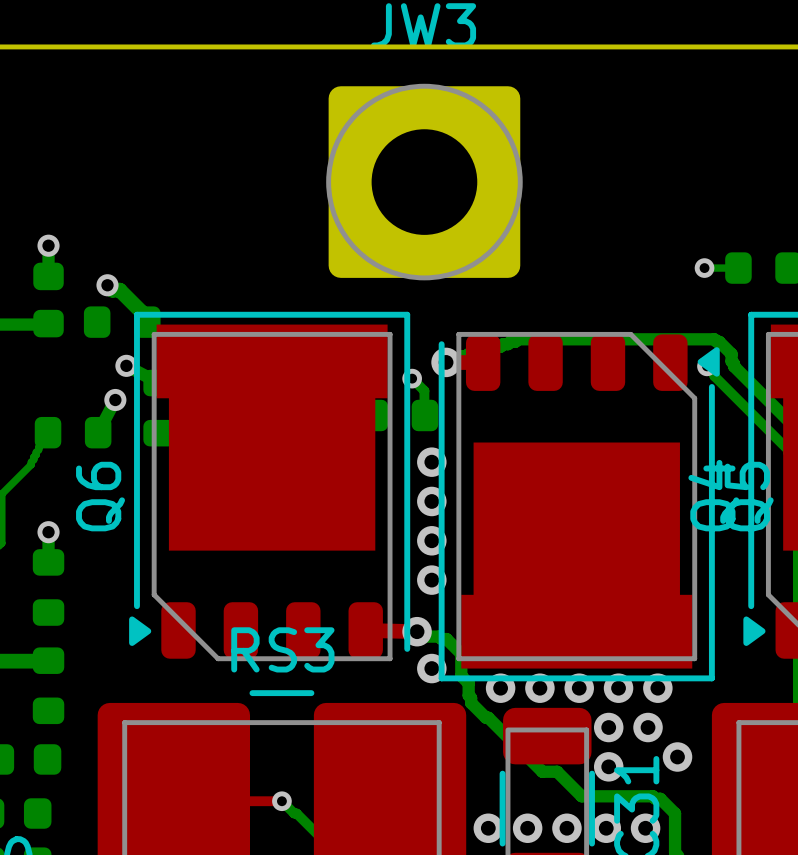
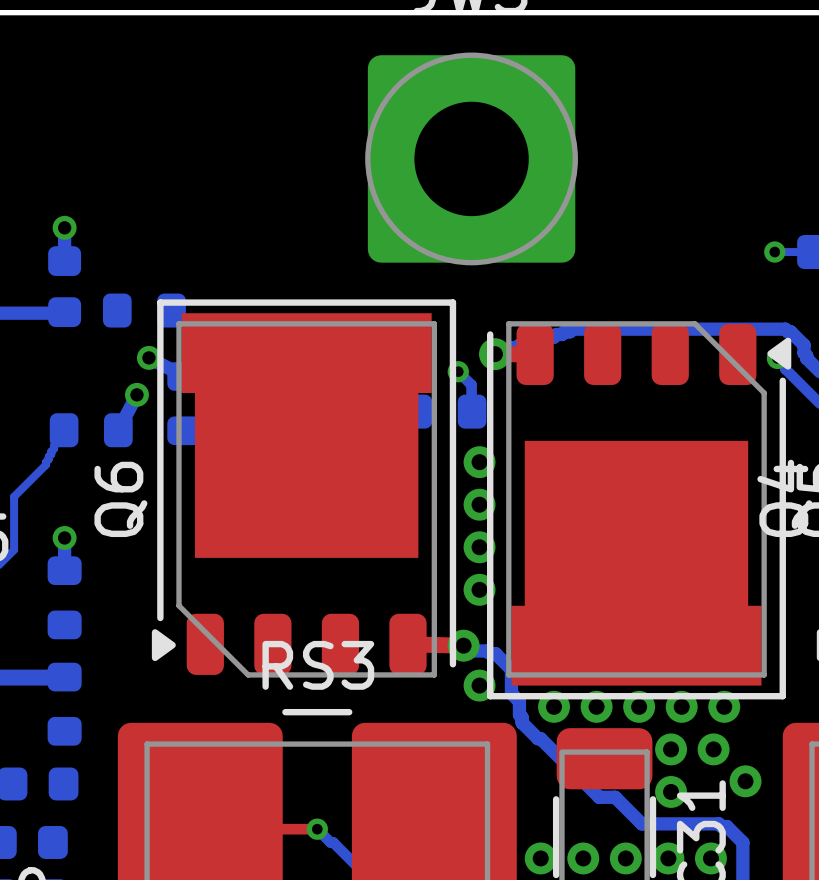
bottom track: (107, 285) (112, 290) (119, 290) (141, 312) (147, 322) -> none
via: (107, 285) -> none

